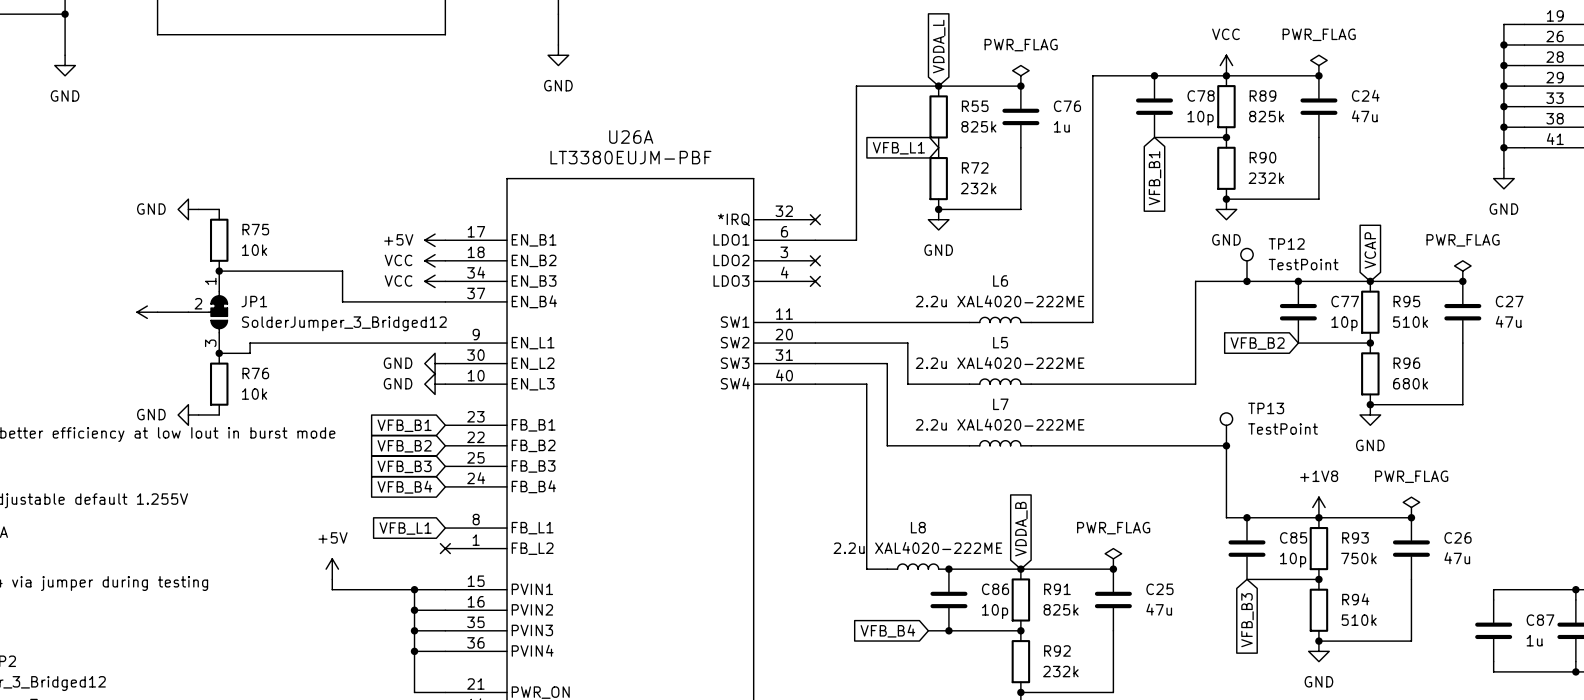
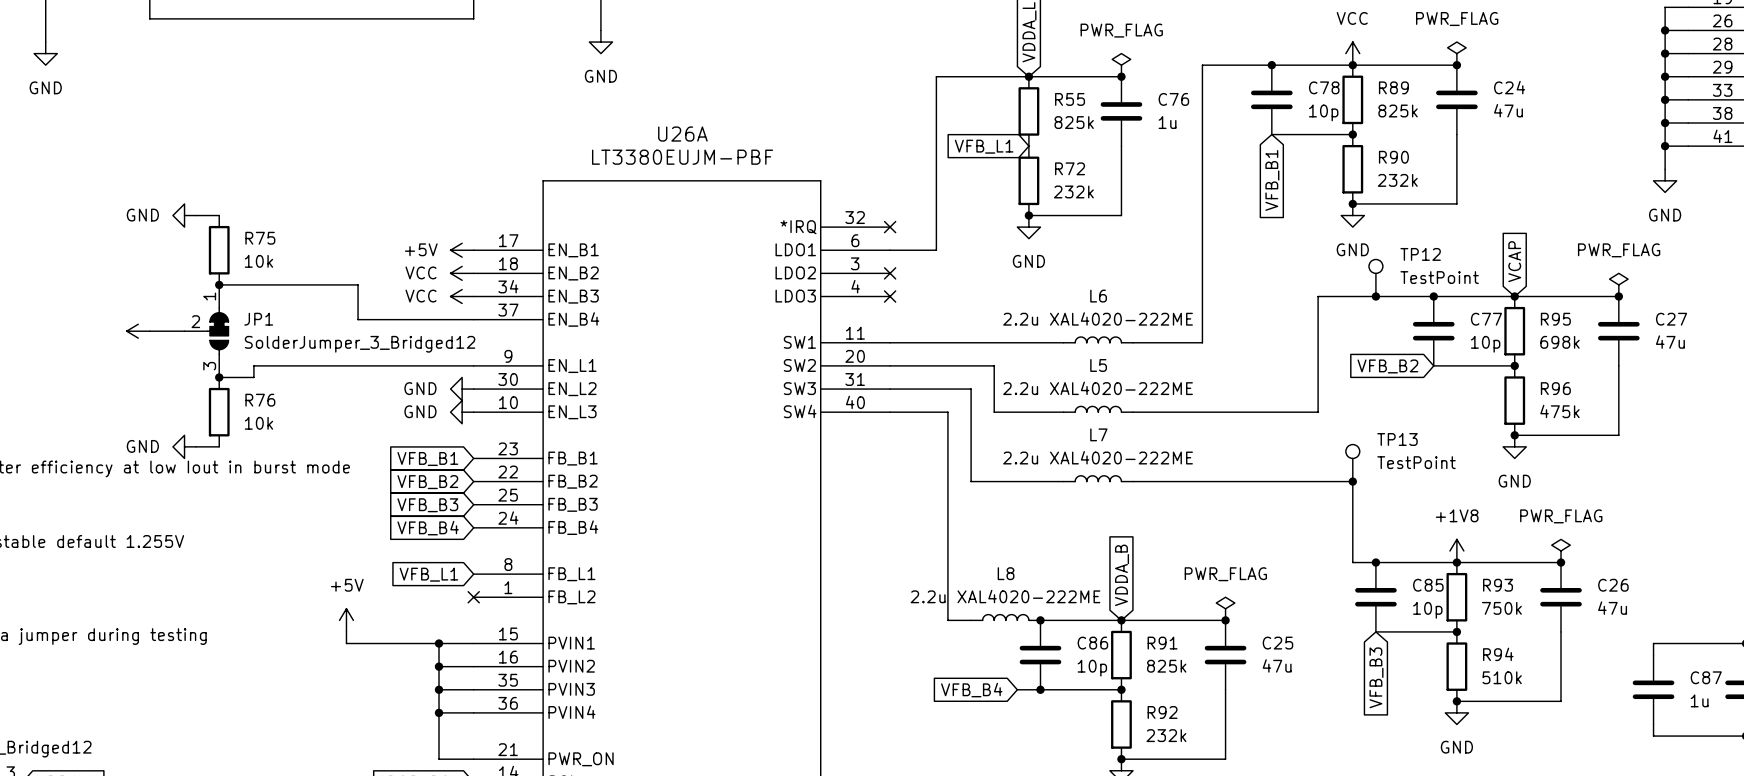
R95 value: 510k (1410, 322) -> 698k (1559, 342)
R96 value: 680k (1410, 383) -> 475k (1559, 411)

